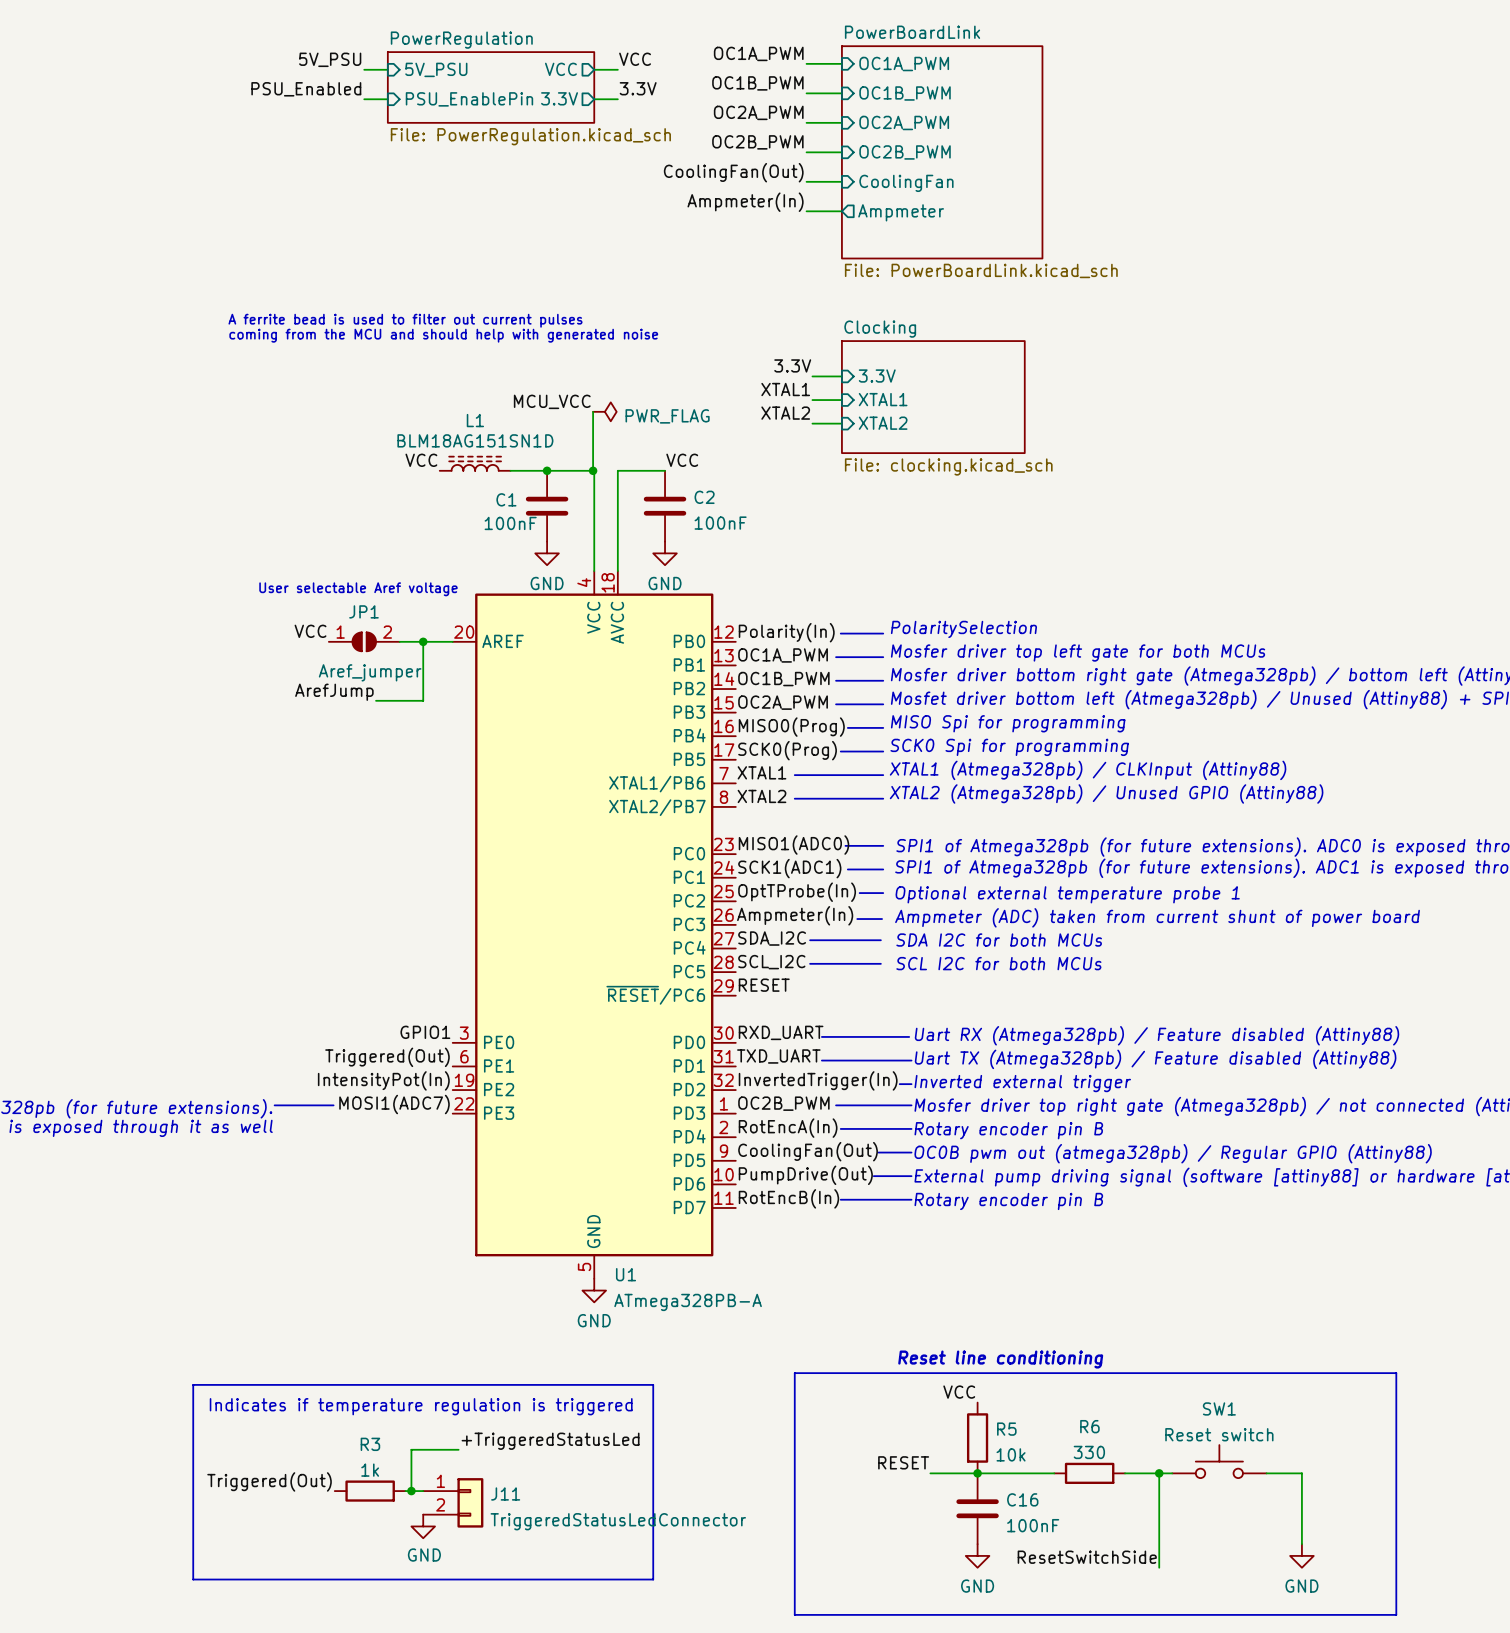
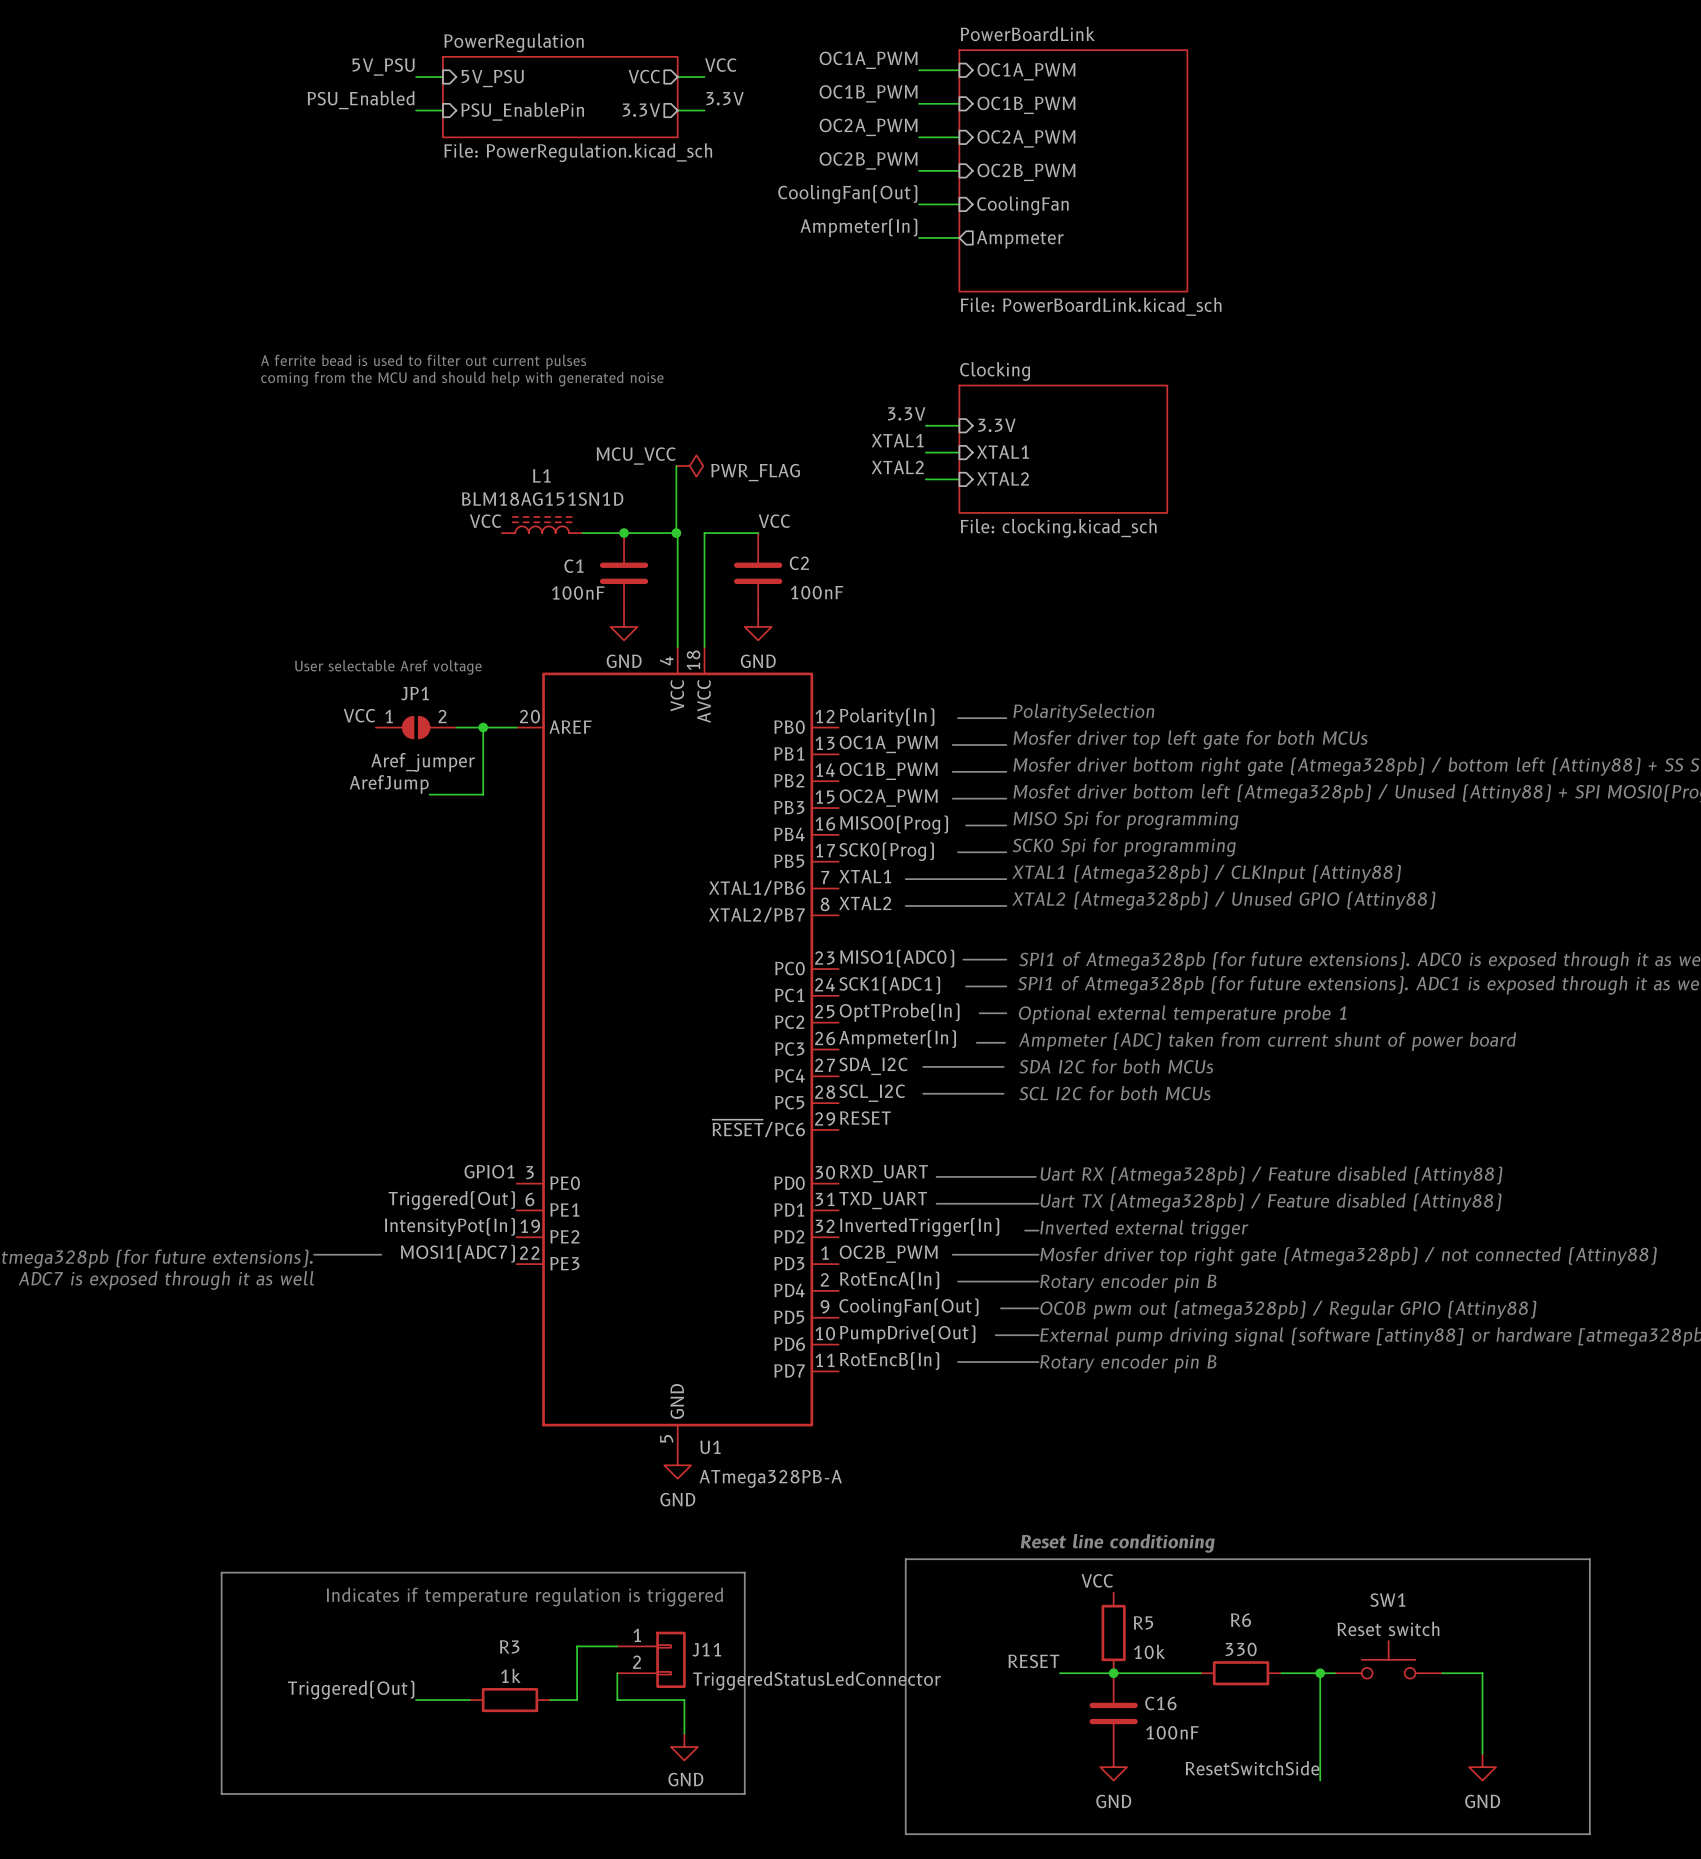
label: +TriggeredStatusLed (550, 1441) -> none
wire: (458, 1449) (411, 1449) (411, 1491) -> none
wire: none -> (617, 1646) (577, 1646) (577, 1700) (550, 1700)
wire: none -> (617, 1673) (617, 1700) (684, 1700) (684, 1733)
label position: Triggered(Out) (269, 1481) -> Triggered(Out) (351, 1689)
R3 position: (370, 1491) -> (510, 1700)
wire: (405, 1491) (423, 1491) -> none
junction: (411, 1491) -> none
wire: none -> (416, 1700) (469, 1700)
J11 position: (453, 1502) -> (651, 1659)
power symbol position: GND (423, 1526) -> GND (684, 1747)

